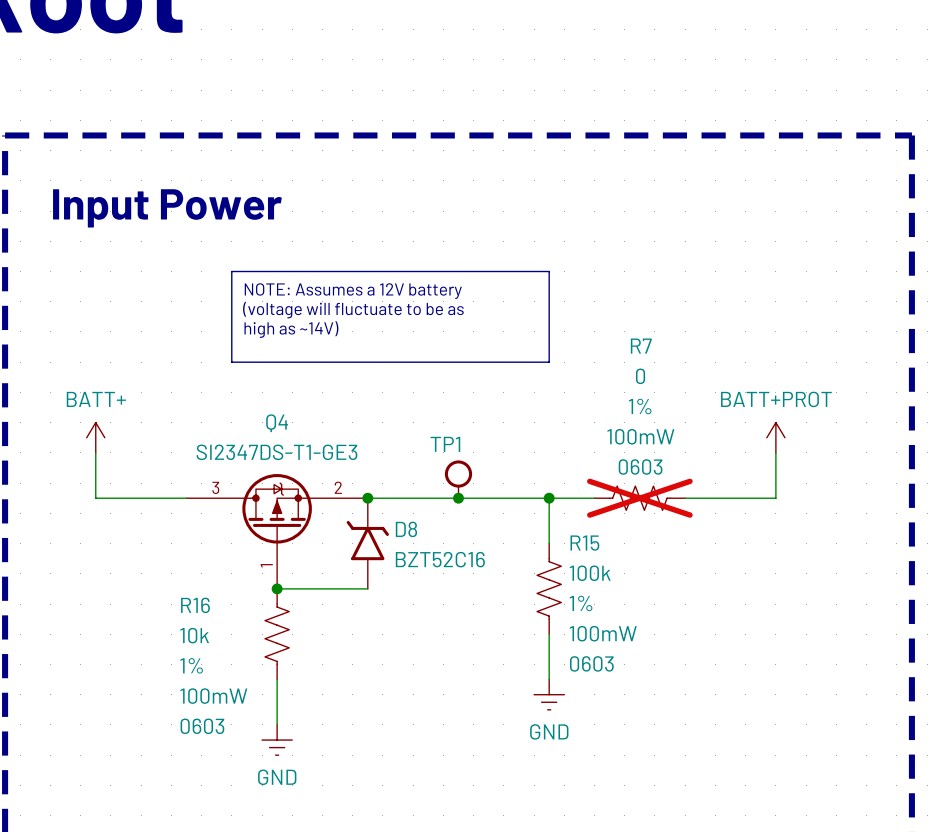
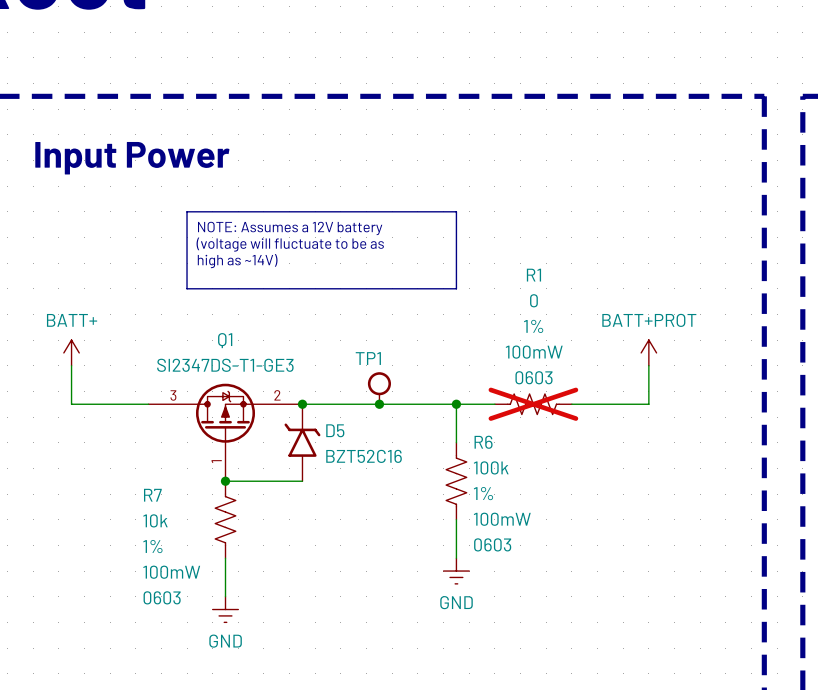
R7 name: R7 (641, 346) -> R1 (533, 275)
Q4 name: Q4 (277, 423) -> Q1 (225, 340)
D8 name: D8 (406, 529) -> D5 (335, 430)
R15 name: R15 (584, 543) -> R6 (483, 442)
R16 name: R16 (195, 605) -> R7 (152, 495)

